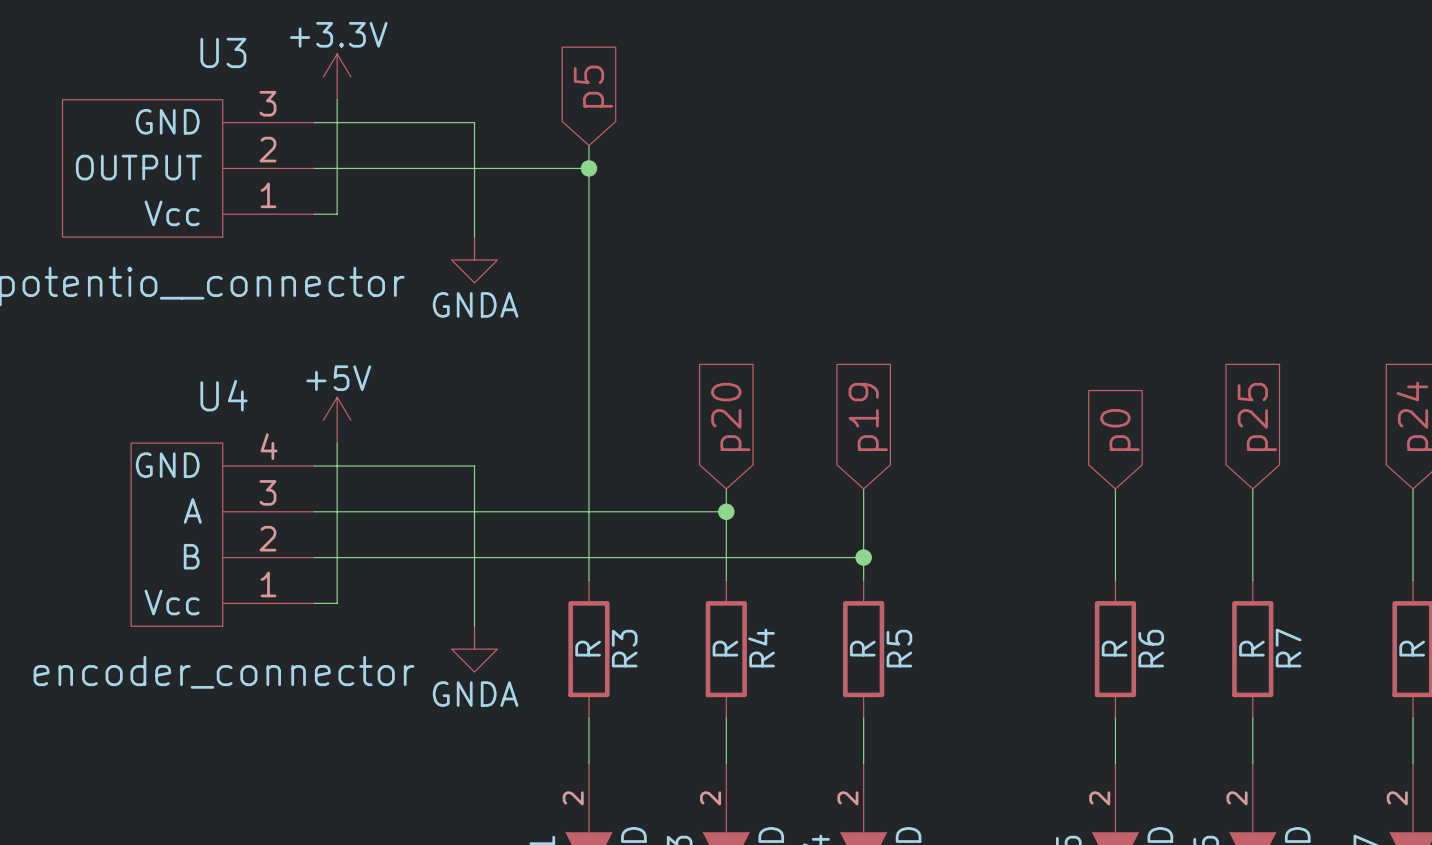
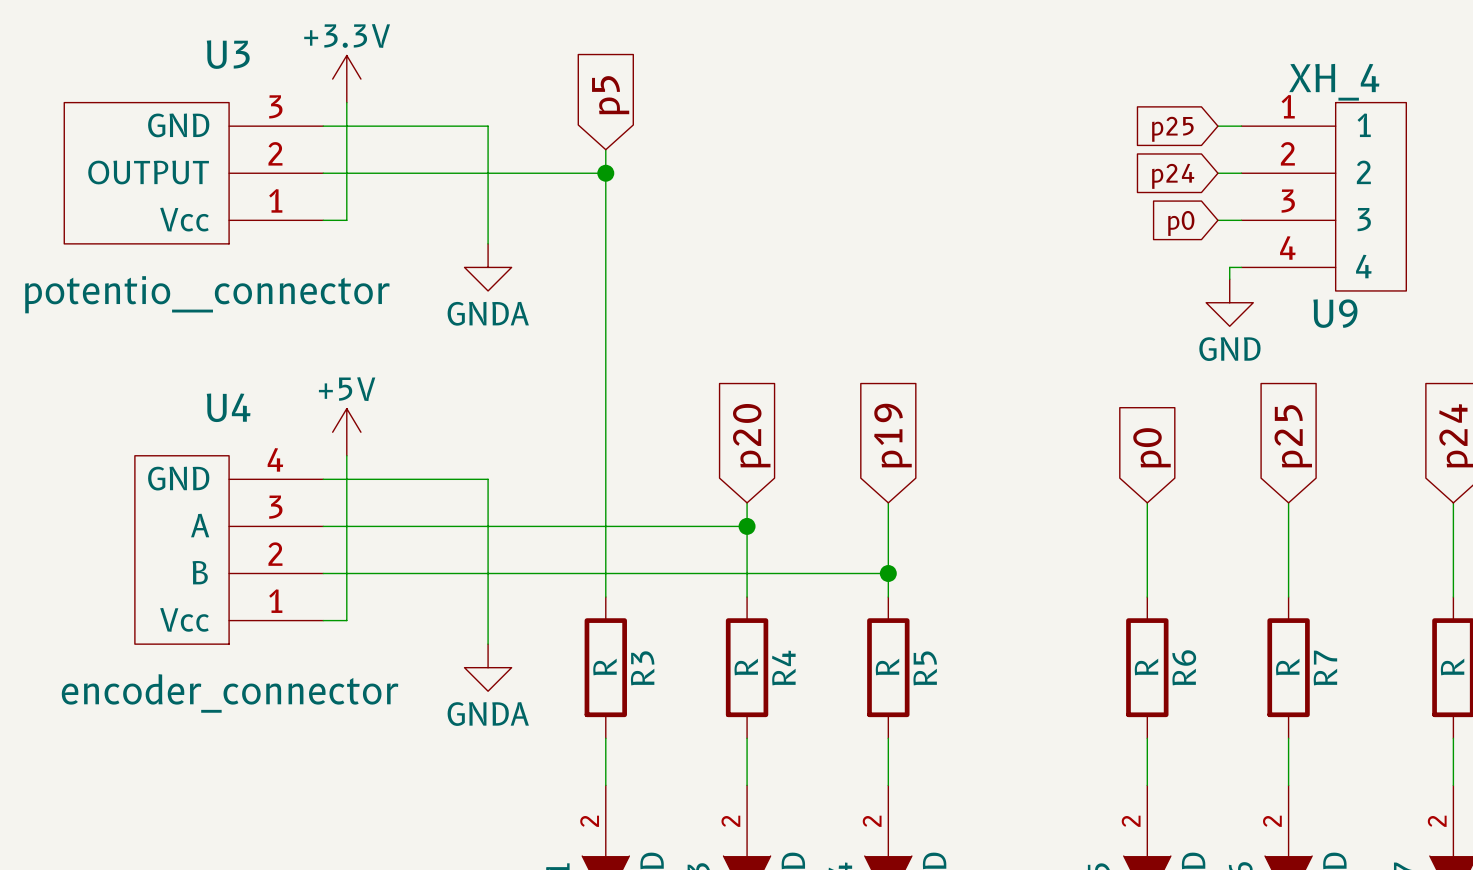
wire: none -> (1217, 126) (1241, 126)
global label: none -> p25 (1172, 129)
wire: none -> (1217, 173) (1241, 173)
global label: none -> p24 (1173, 176)
U9: none -> XH_4 (1323, 196)
wire: none -> (1217, 220) (1241, 220)
global label: none -> p0 (1181, 223)
wire: none -> (1241, 267) (1229, 267) (1229, 279)
power symbol: none -> GND (1229, 302)

